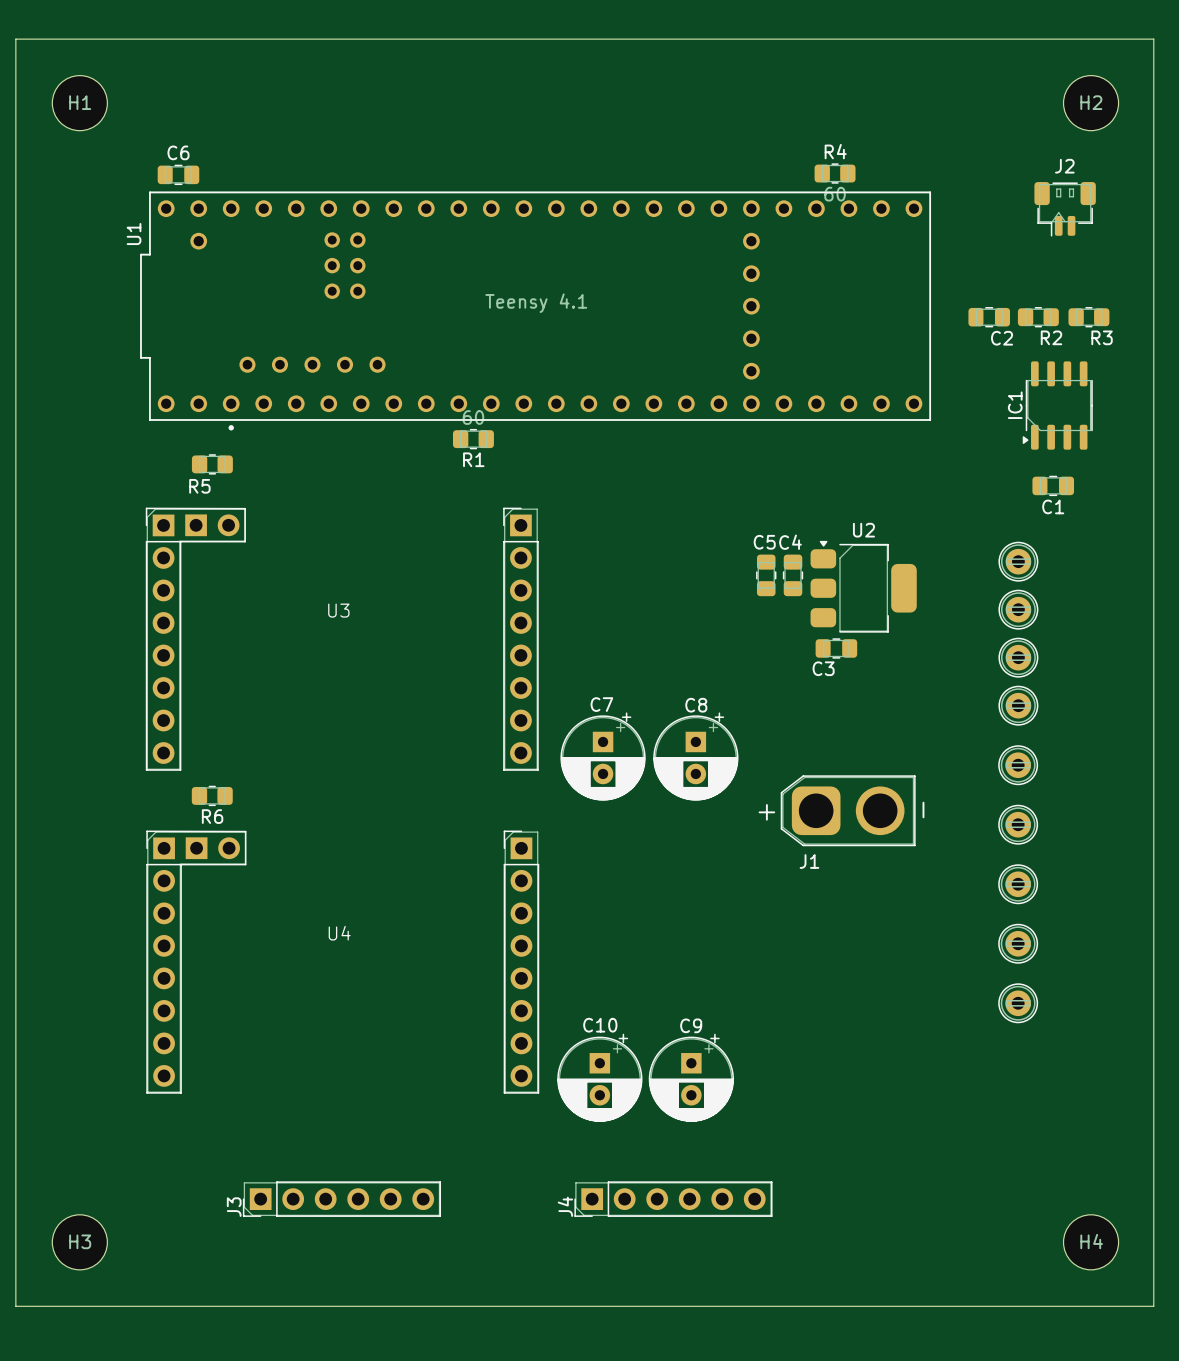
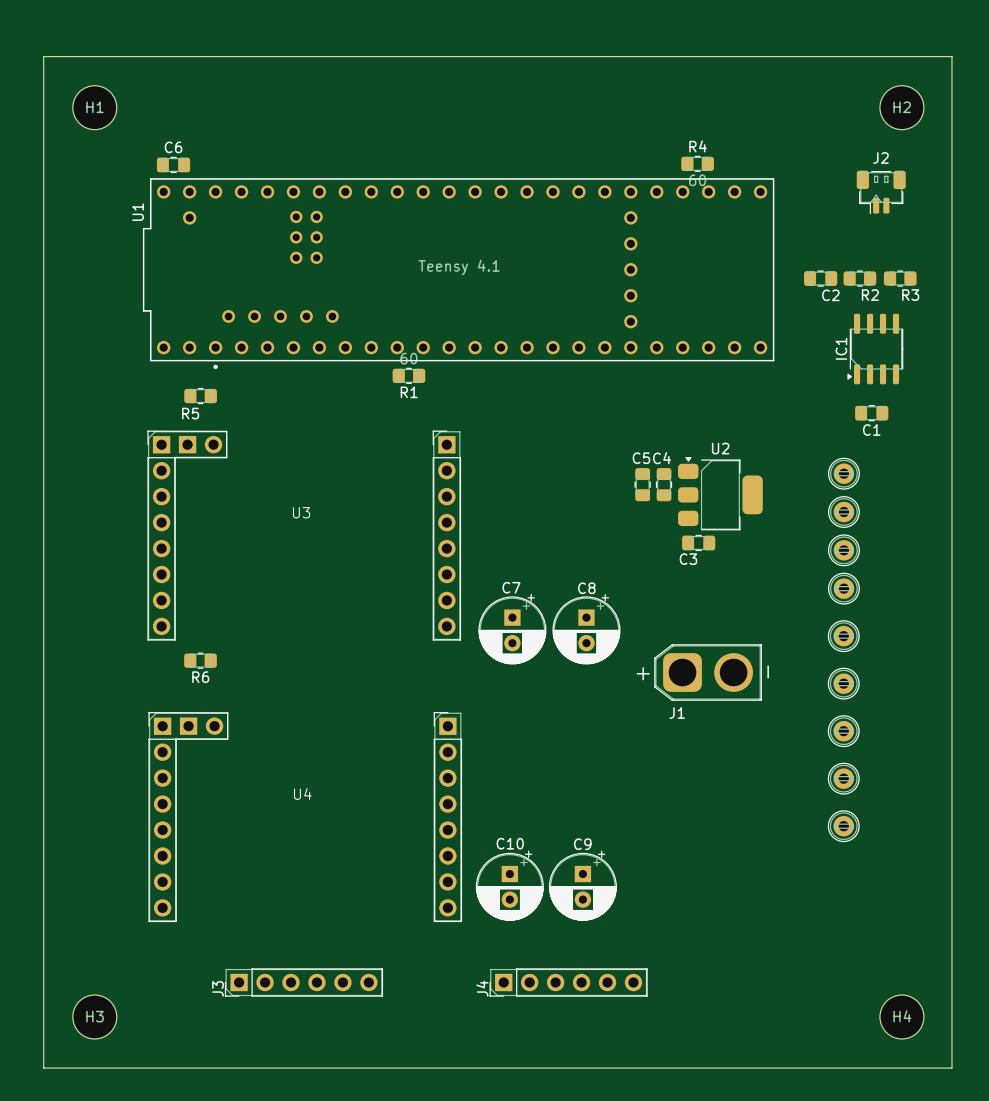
U4 footprint: [146, 830, 540, 1094] -> [148, 712, 463, 923]

